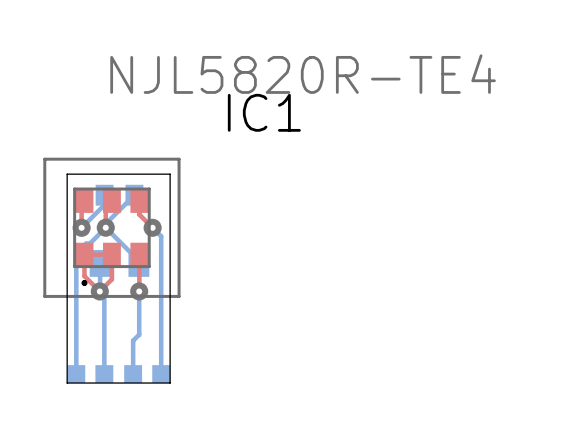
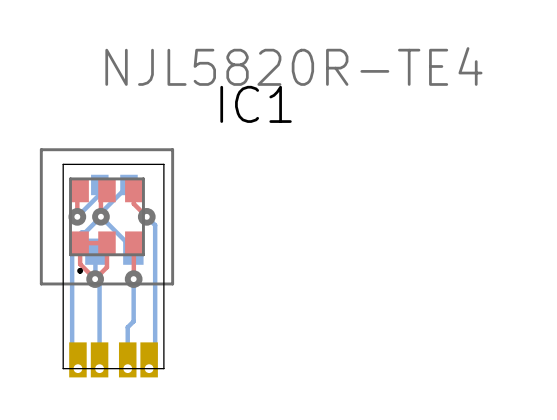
part footprint: [67, 365, 86, 384] -> [69, 342, 87, 378]
part footprint: [95, 365, 114, 384] -> [90, 342, 109, 378]
part footprint: [124, 365, 143, 384] -> [118, 342, 137, 378]
part footprint: [152, 365, 171, 384] -> [140, 342, 158, 378]

